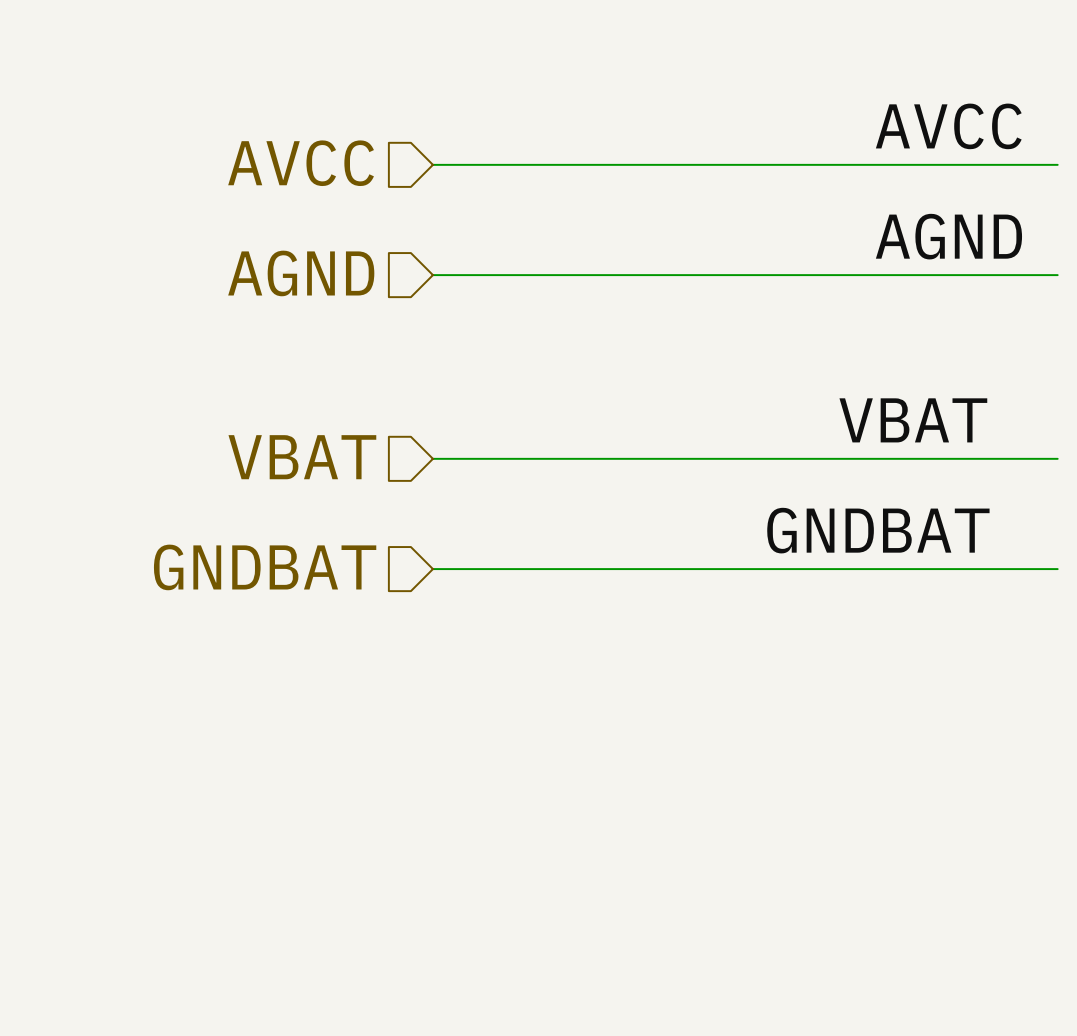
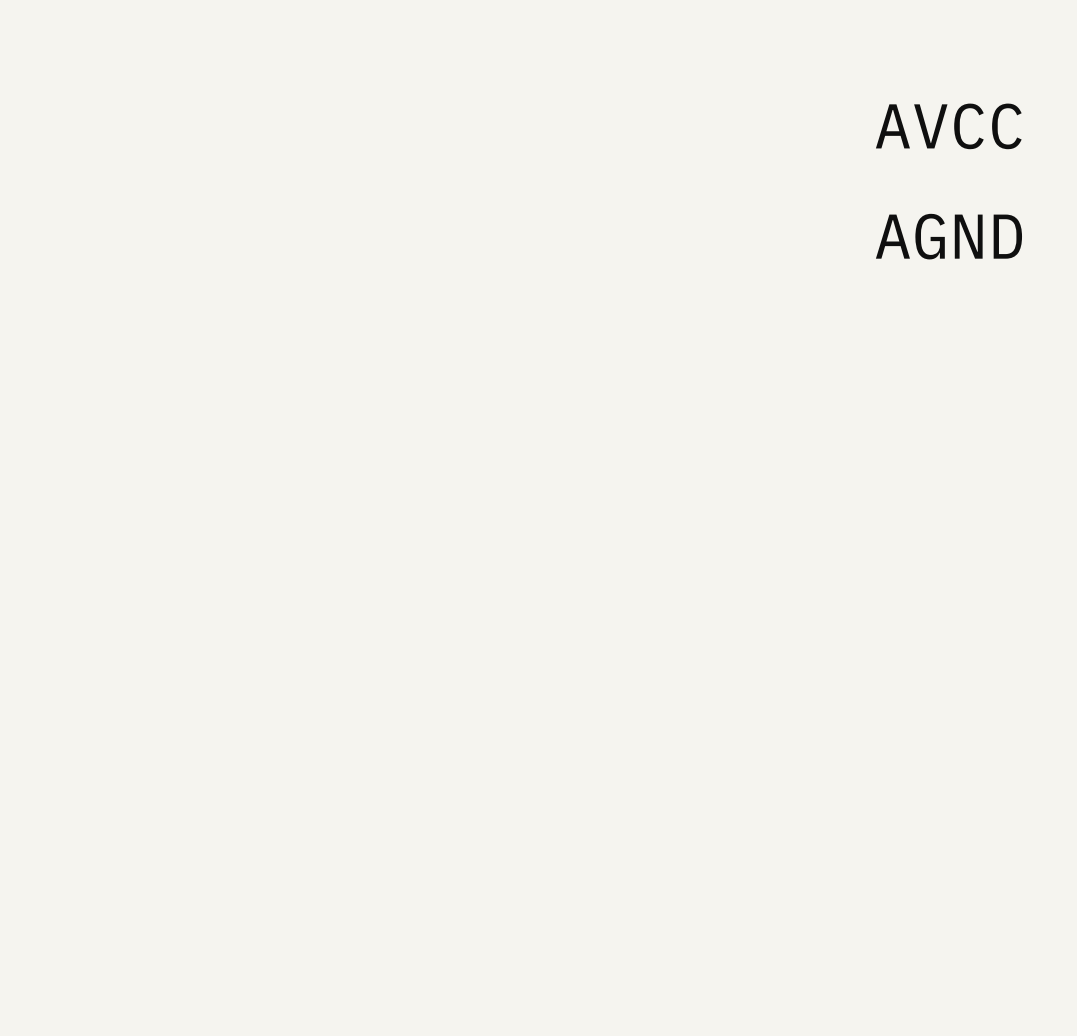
hierarchical label: AVCC (301, 163) -> none
wire: (432, 164) (1057, 164) -> none
hierarchical label: AGND (301, 273) -> none
wire: (432, 275) (1057, 275) -> none
label: VBAT (913, 420) -> none
hierarchical label: VBAT (302, 457) -> none
wire: (432, 458) (1057, 458) -> none
label: GNDBAT (878, 530) -> none
hierarchical label: GNDBAT (265, 567) -> none
wire: (432, 569) (1057, 569) -> none

